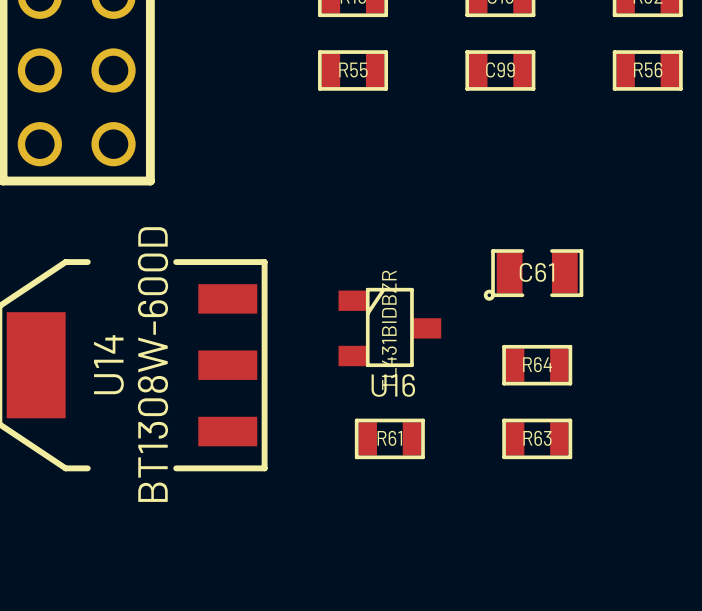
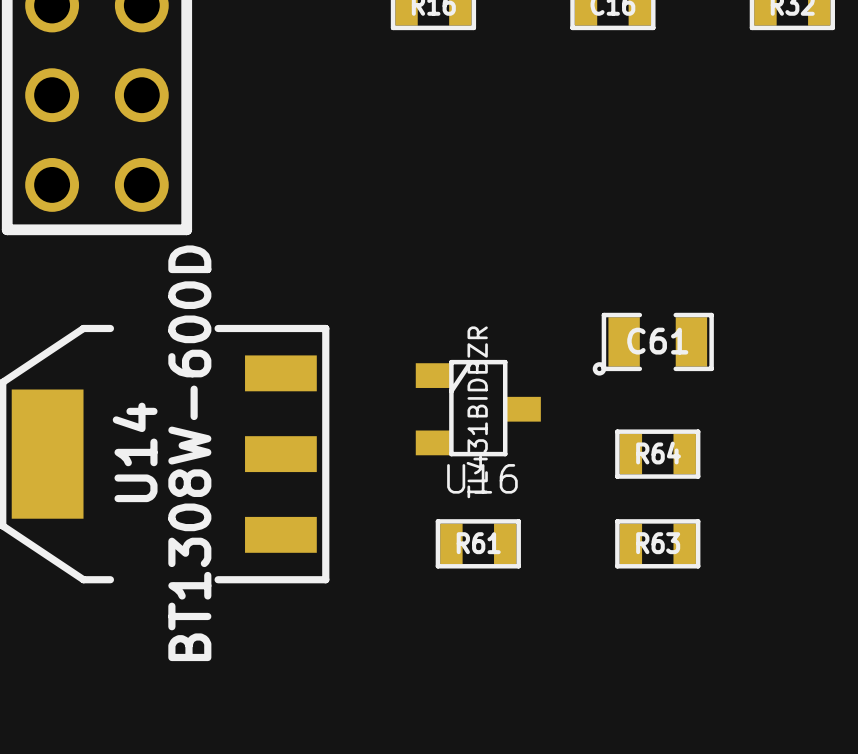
R55: (353, 70) -> none
C99: (500, 70) -> none
R56: (647, 70) -> none

